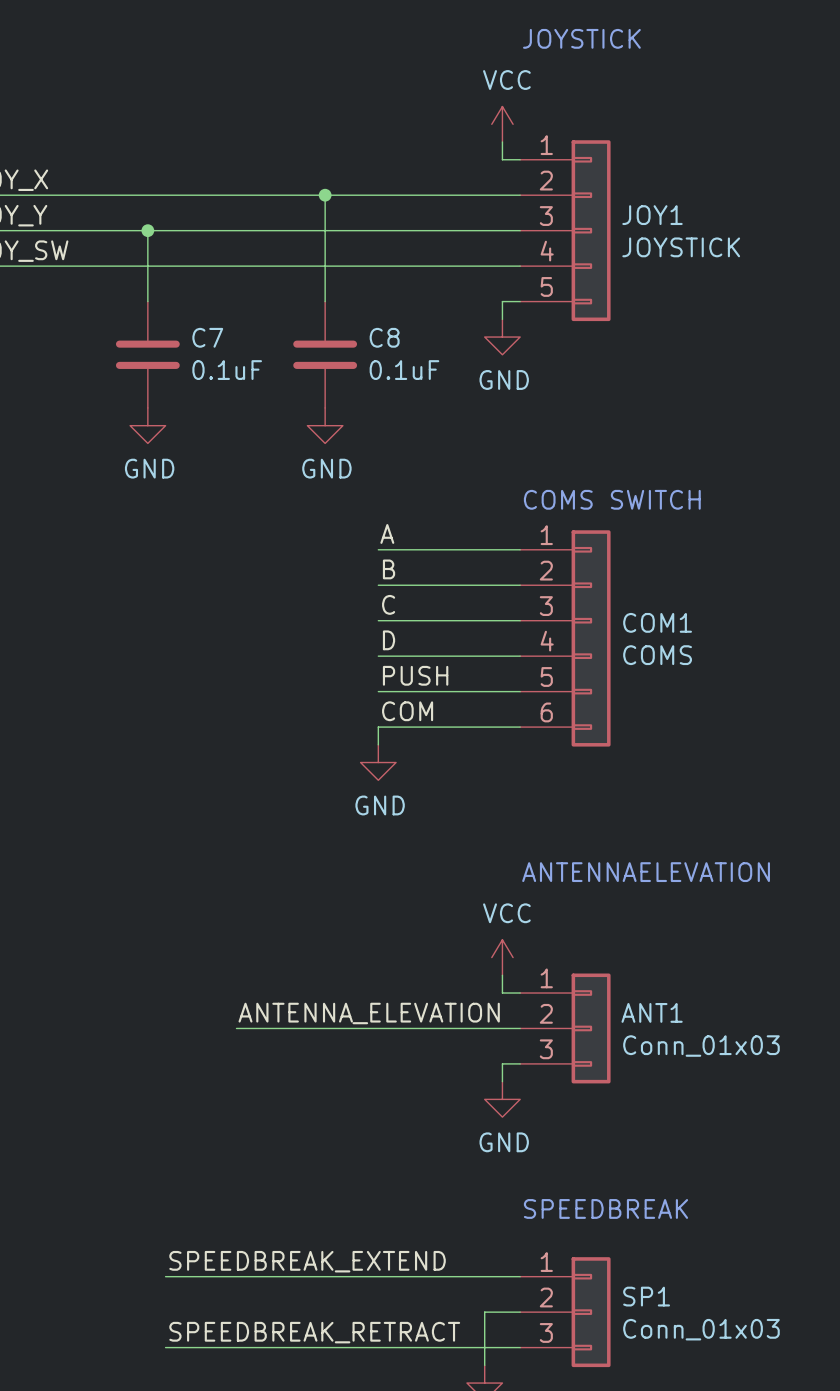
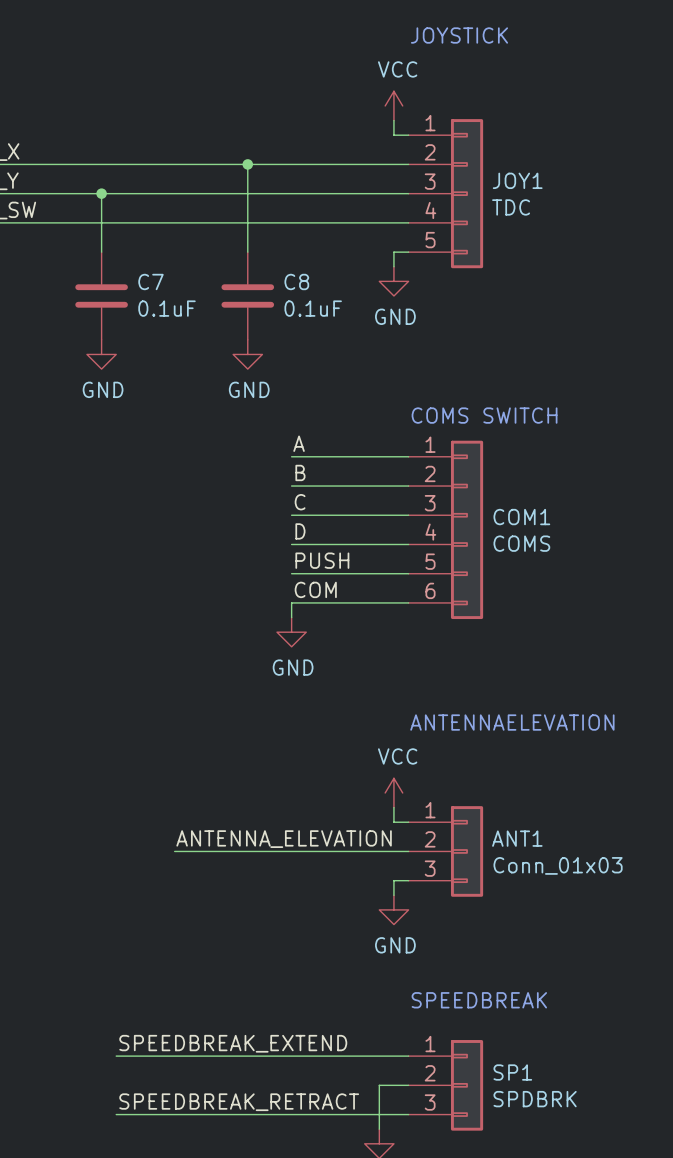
JOY1 value: JOYSTICK (681, 247) -> TDC (511, 207)
SP1 value: Conn_01x03 (701, 1329) -> SPDBRK (535, 1099)

